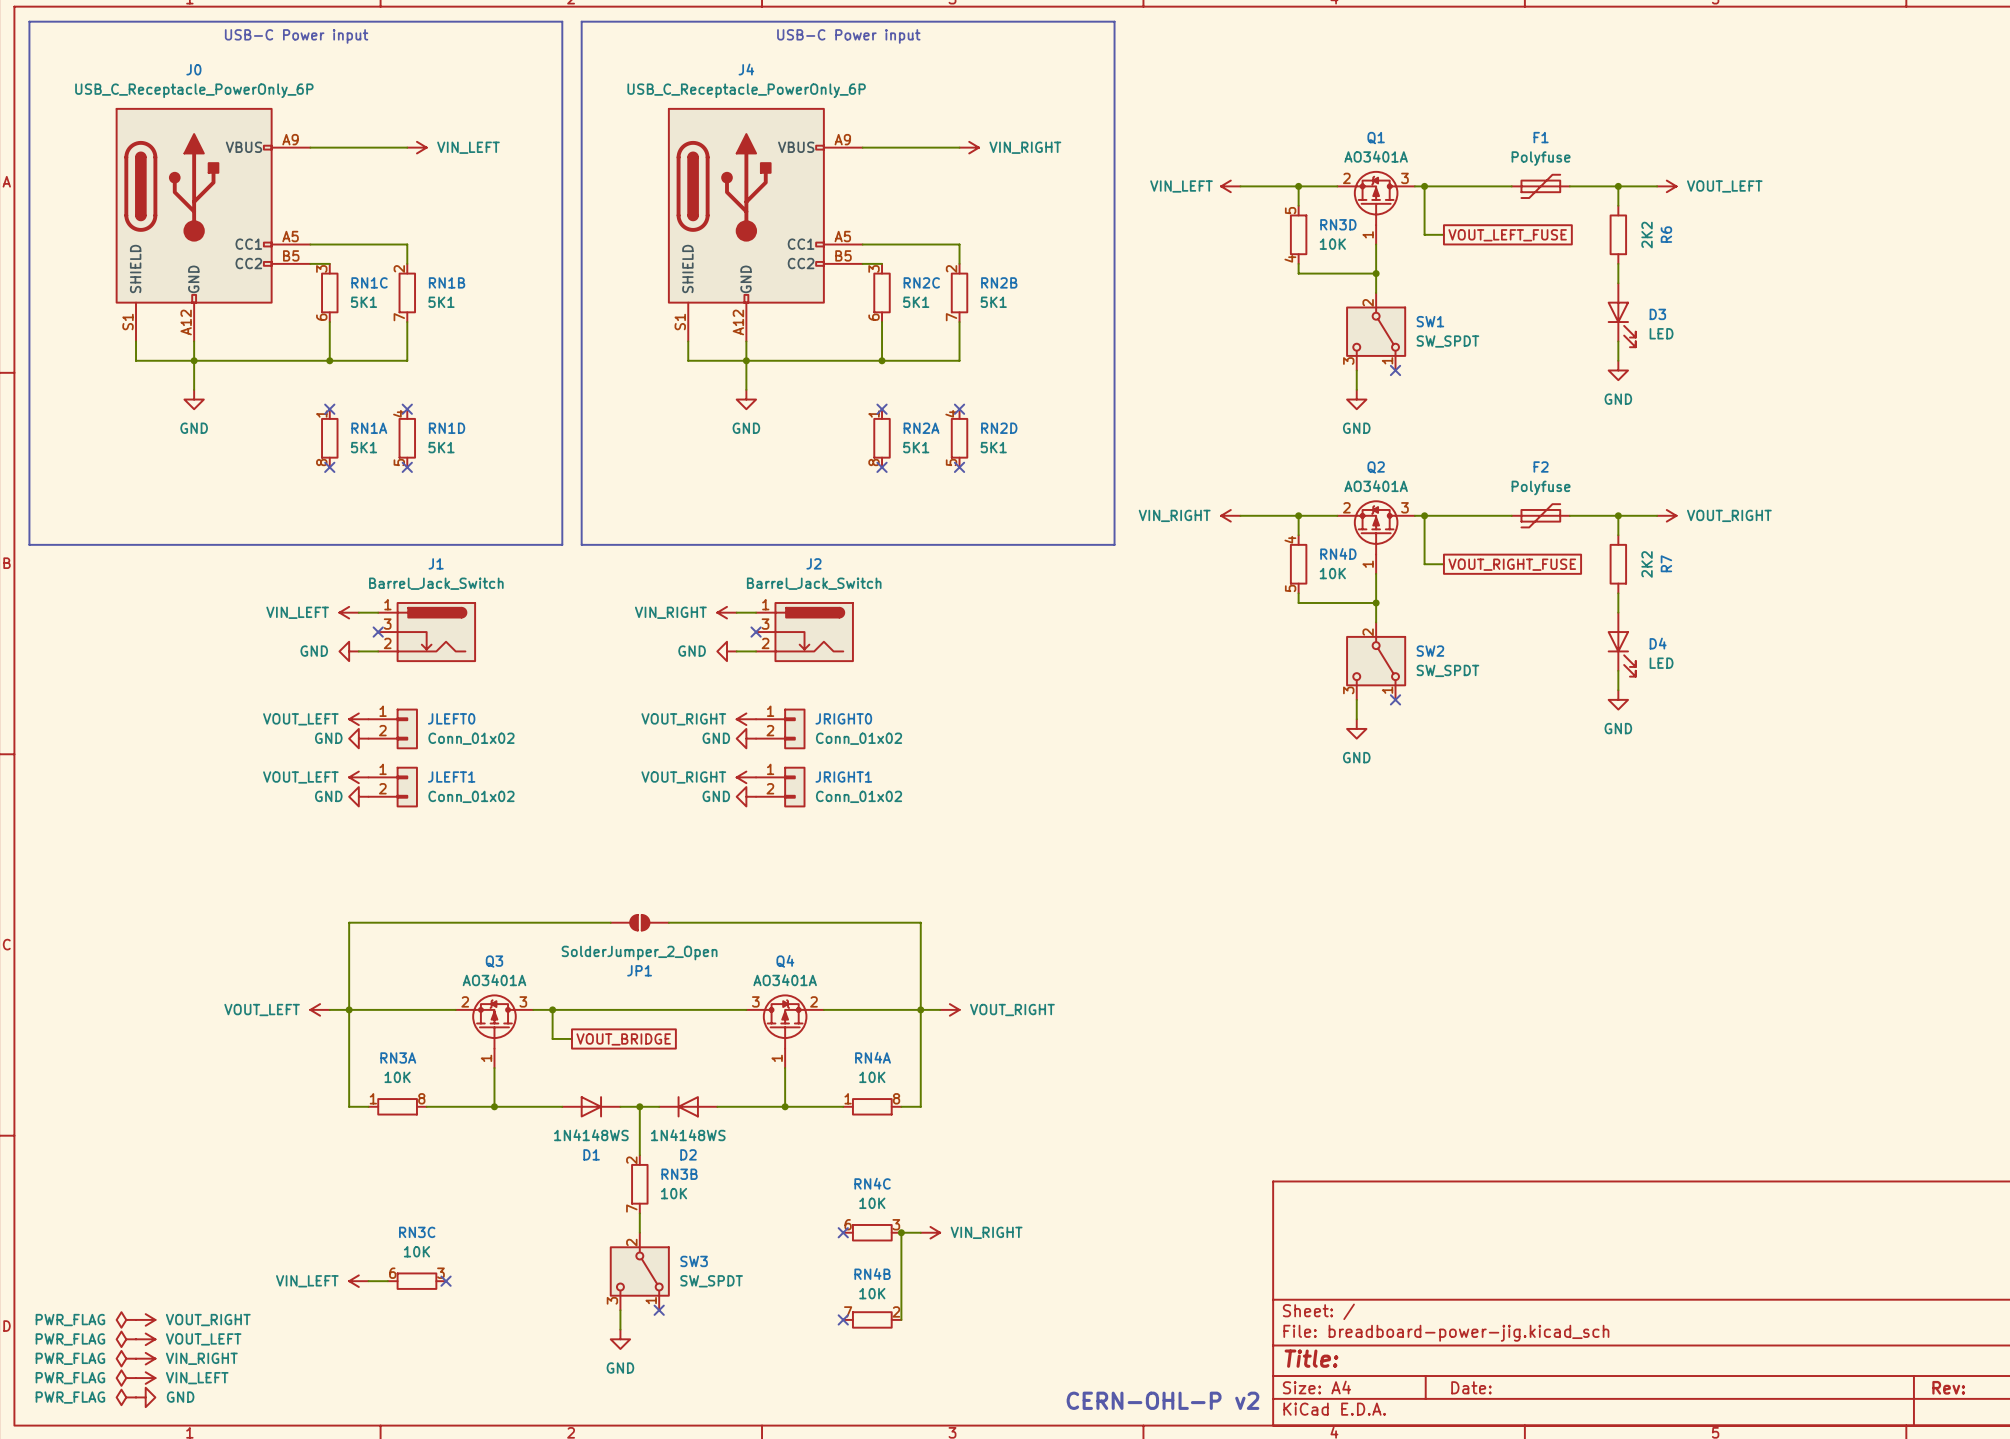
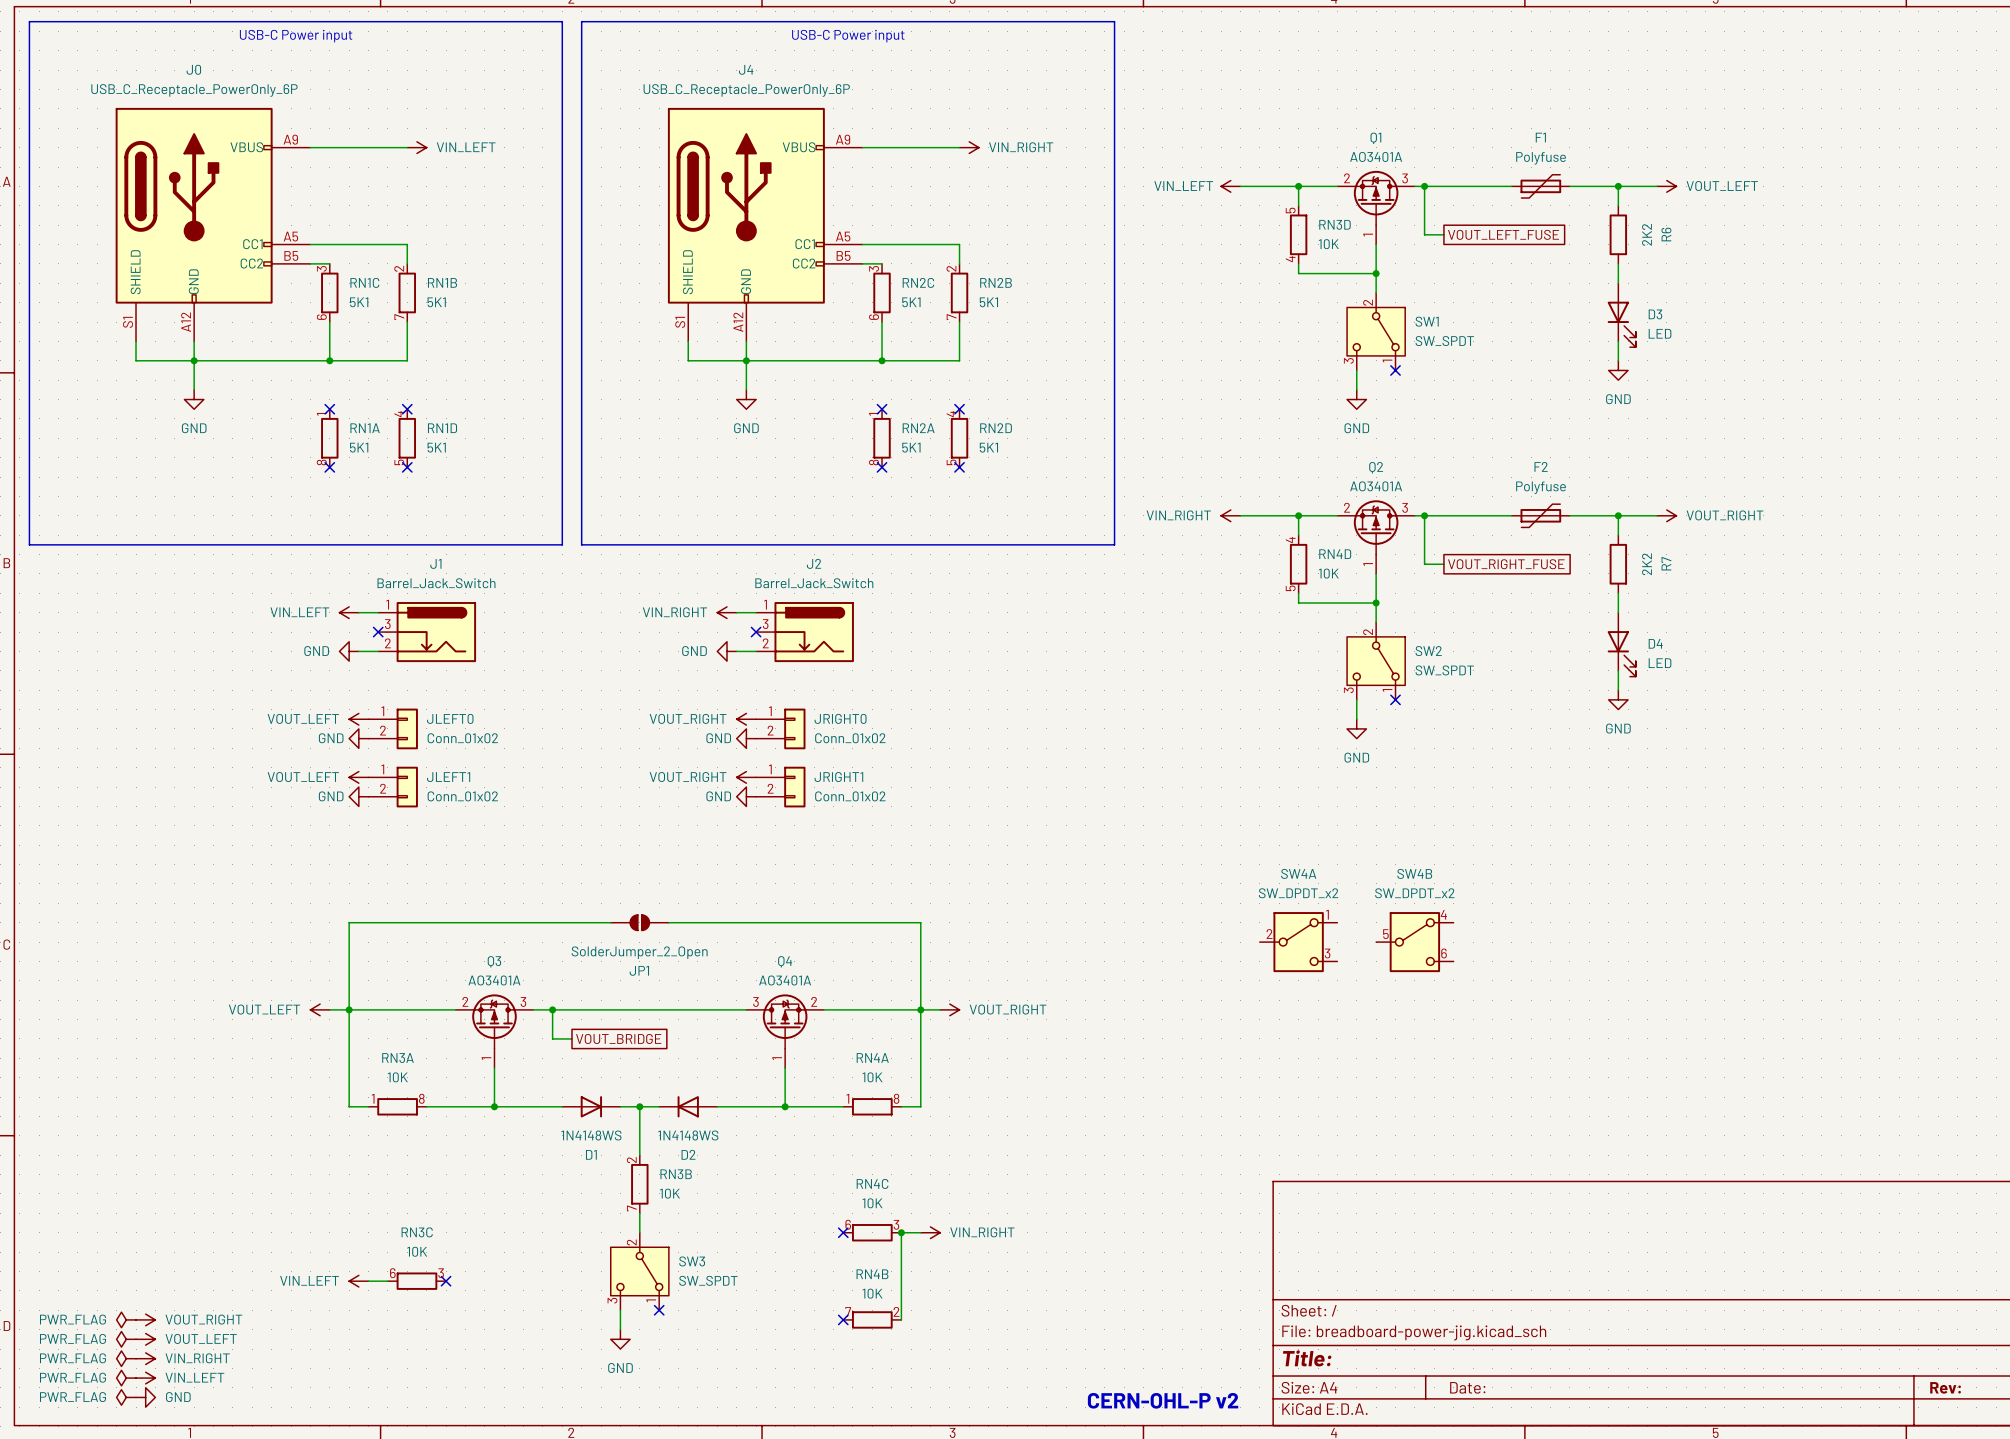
SW4A: none -> SW_DPDT_x2 (1298, 942)
SW4B: none -> SW_DPDT_x2 (1414, 942)

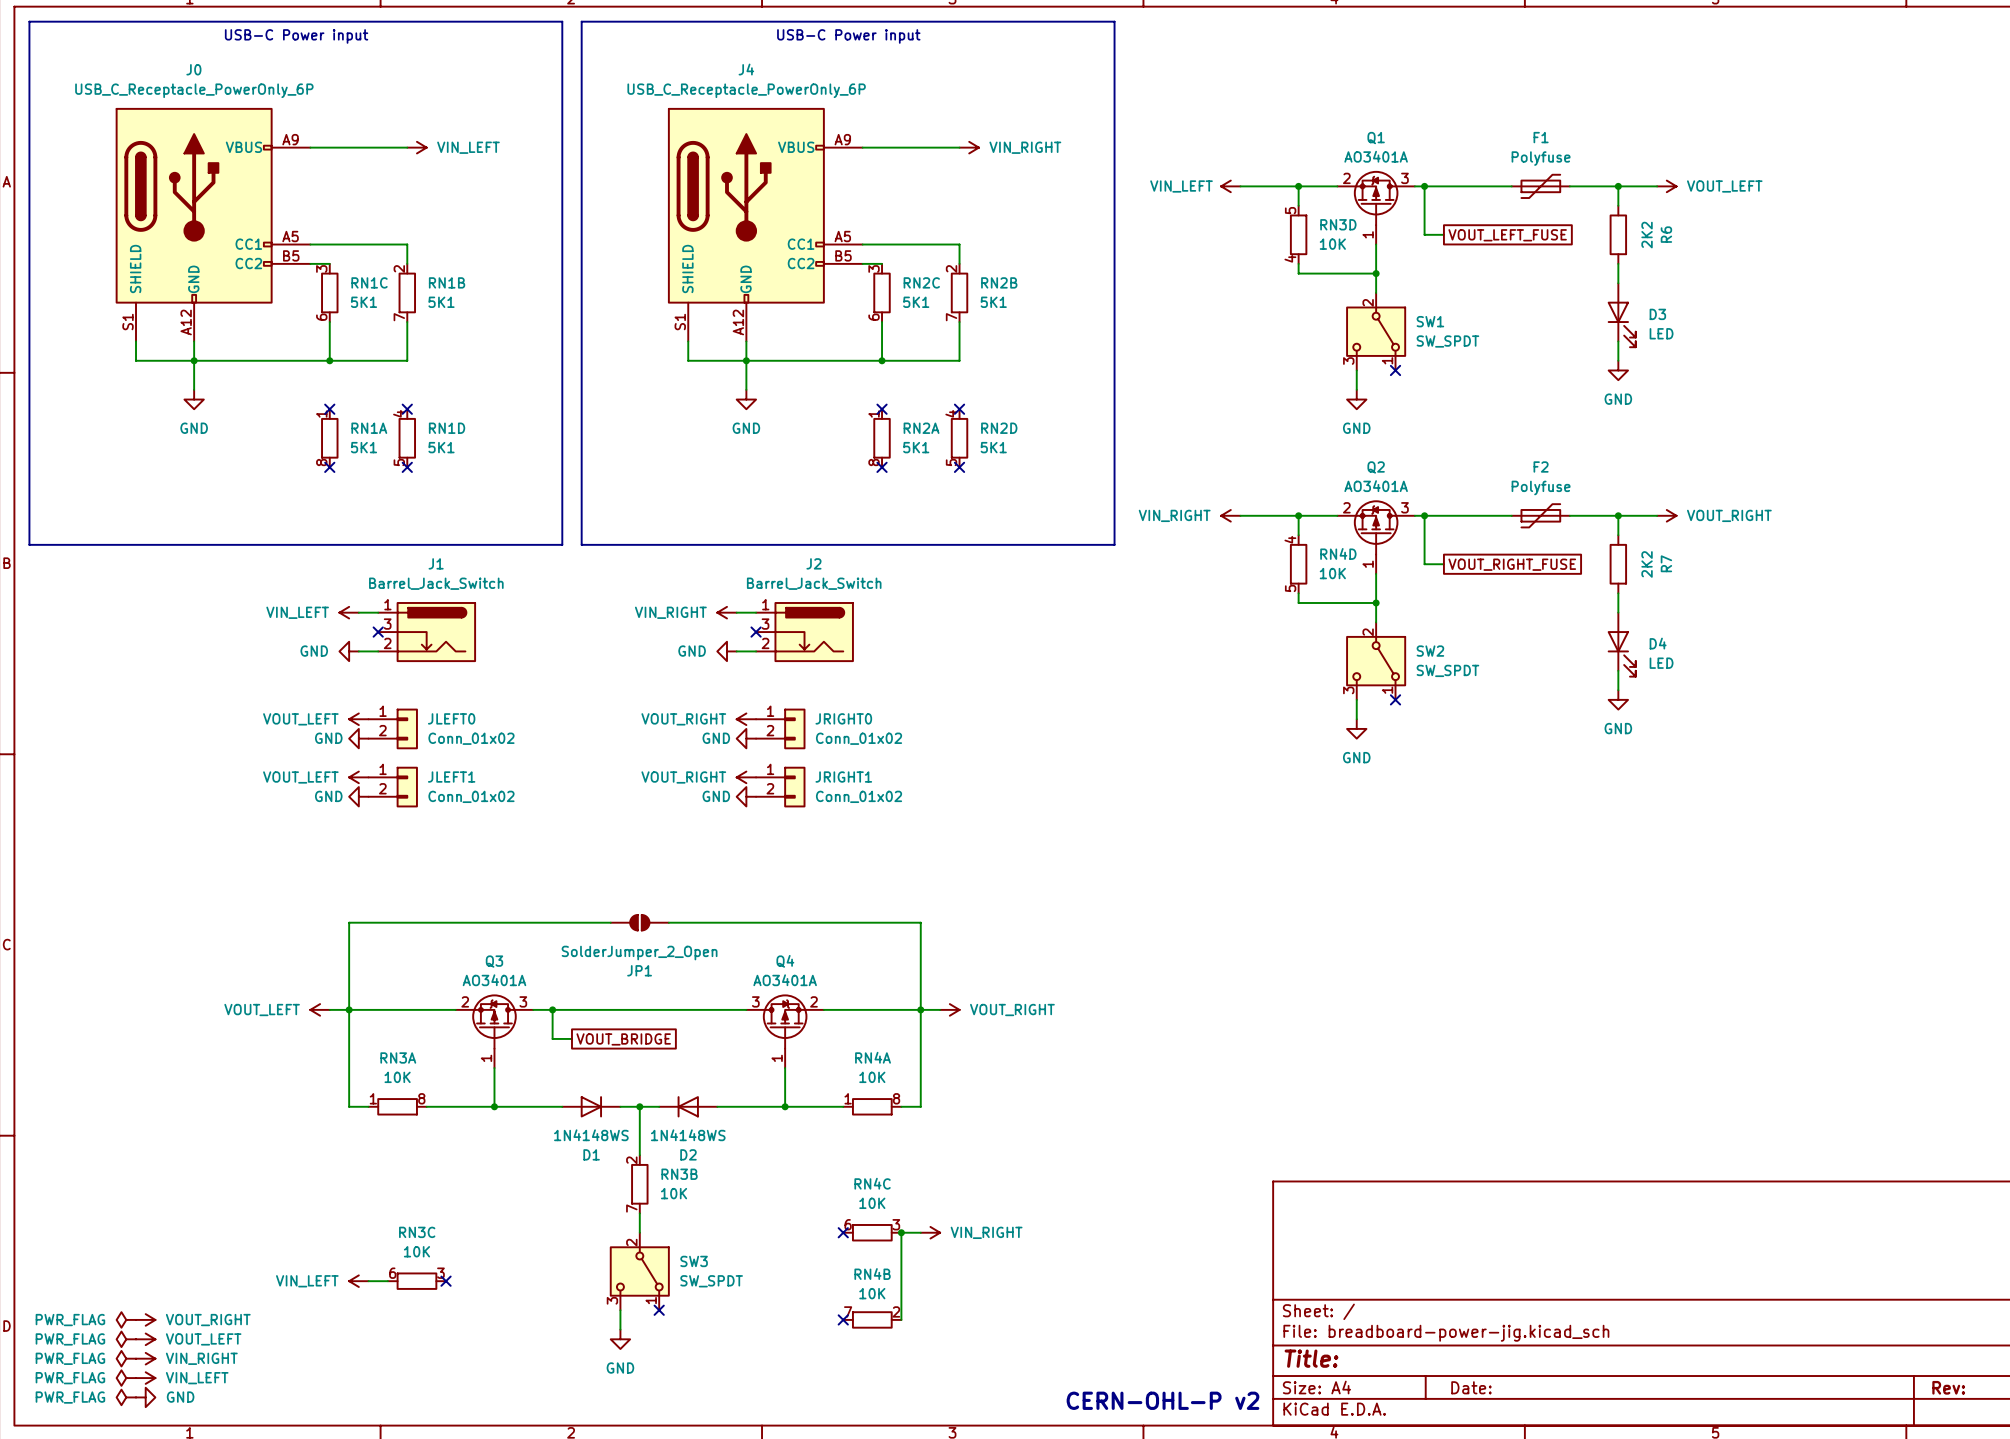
SW4A: SW_DPDT_x2 (1298, 942) -> none
SW4B: SW_DPDT_x2 (1414, 942) -> none

